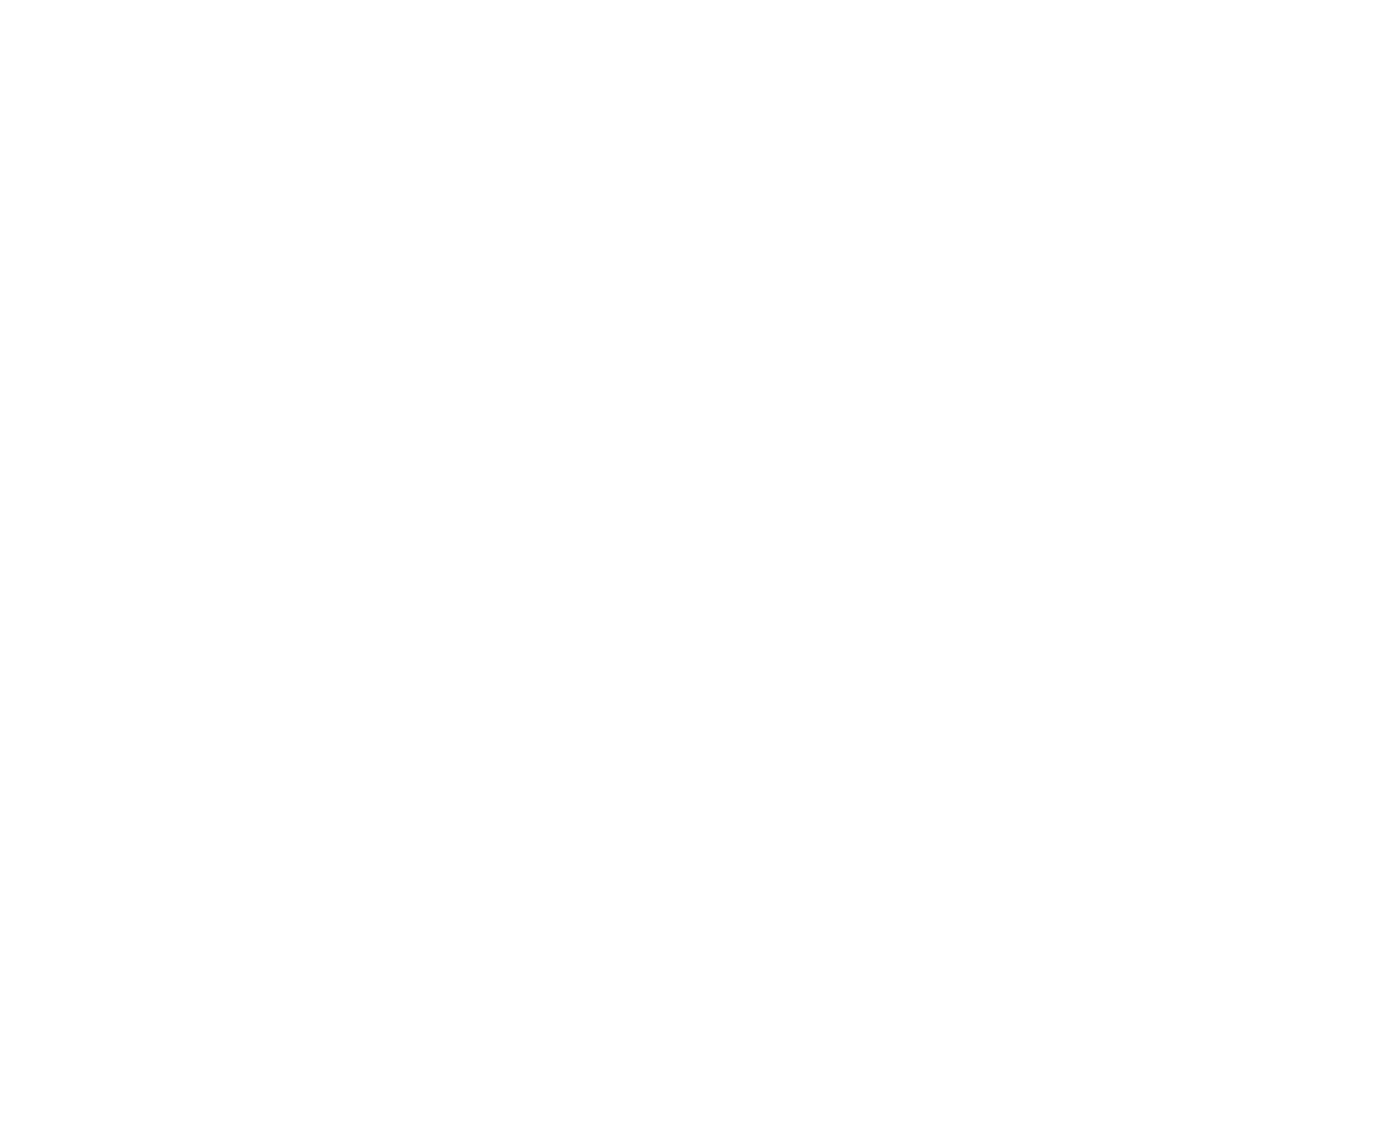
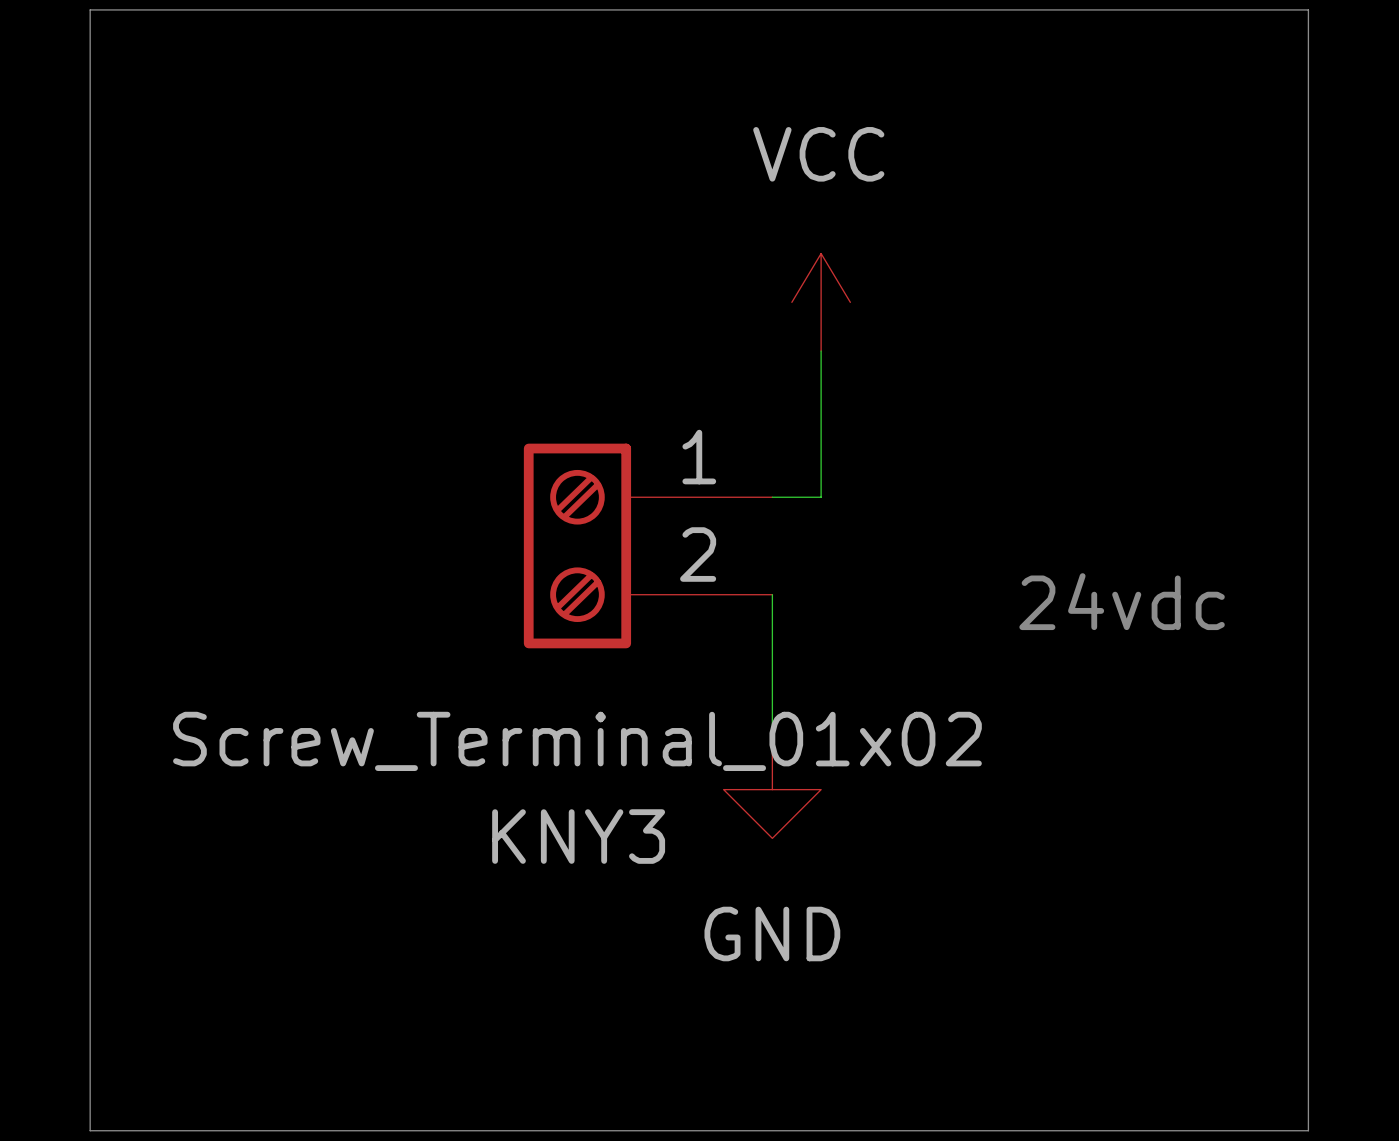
line: none -> (90, 9) (1308, 9) (1308, 1130) (90, 1130) (90, 9)
power symbol: none -> VCC (821, 302)
wire: none -> (821, 351) (821, 497) (772, 497)
KNY3: none -> Screw_Terminal_01x02 (648, 545)
wire: none -> (772, 594) (772, 740)
text: none -> 24vdc (1122, 601)
power symbol: none -> GND (772, 789)

